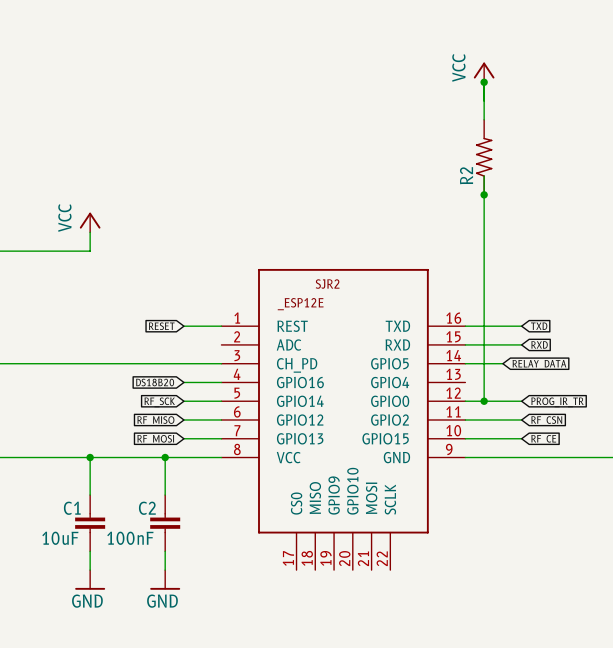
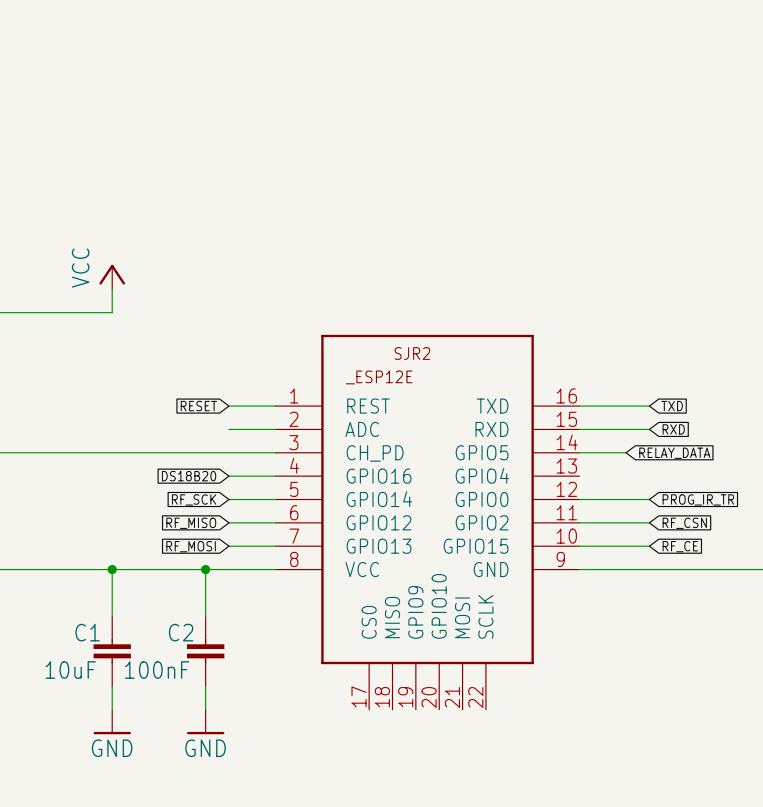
power symbol: VCC (484, 72) -> none
wire: (484, 82) (484, 119) -> none
junction: (484, 82) -> none
R2: (484, 157) -> none
wire: (484, 176) (484, 401) -> none
junction: (484, 194) -> none
wire: none -> (229, 429) (275, 429)
junction: (484, 401) -> none

